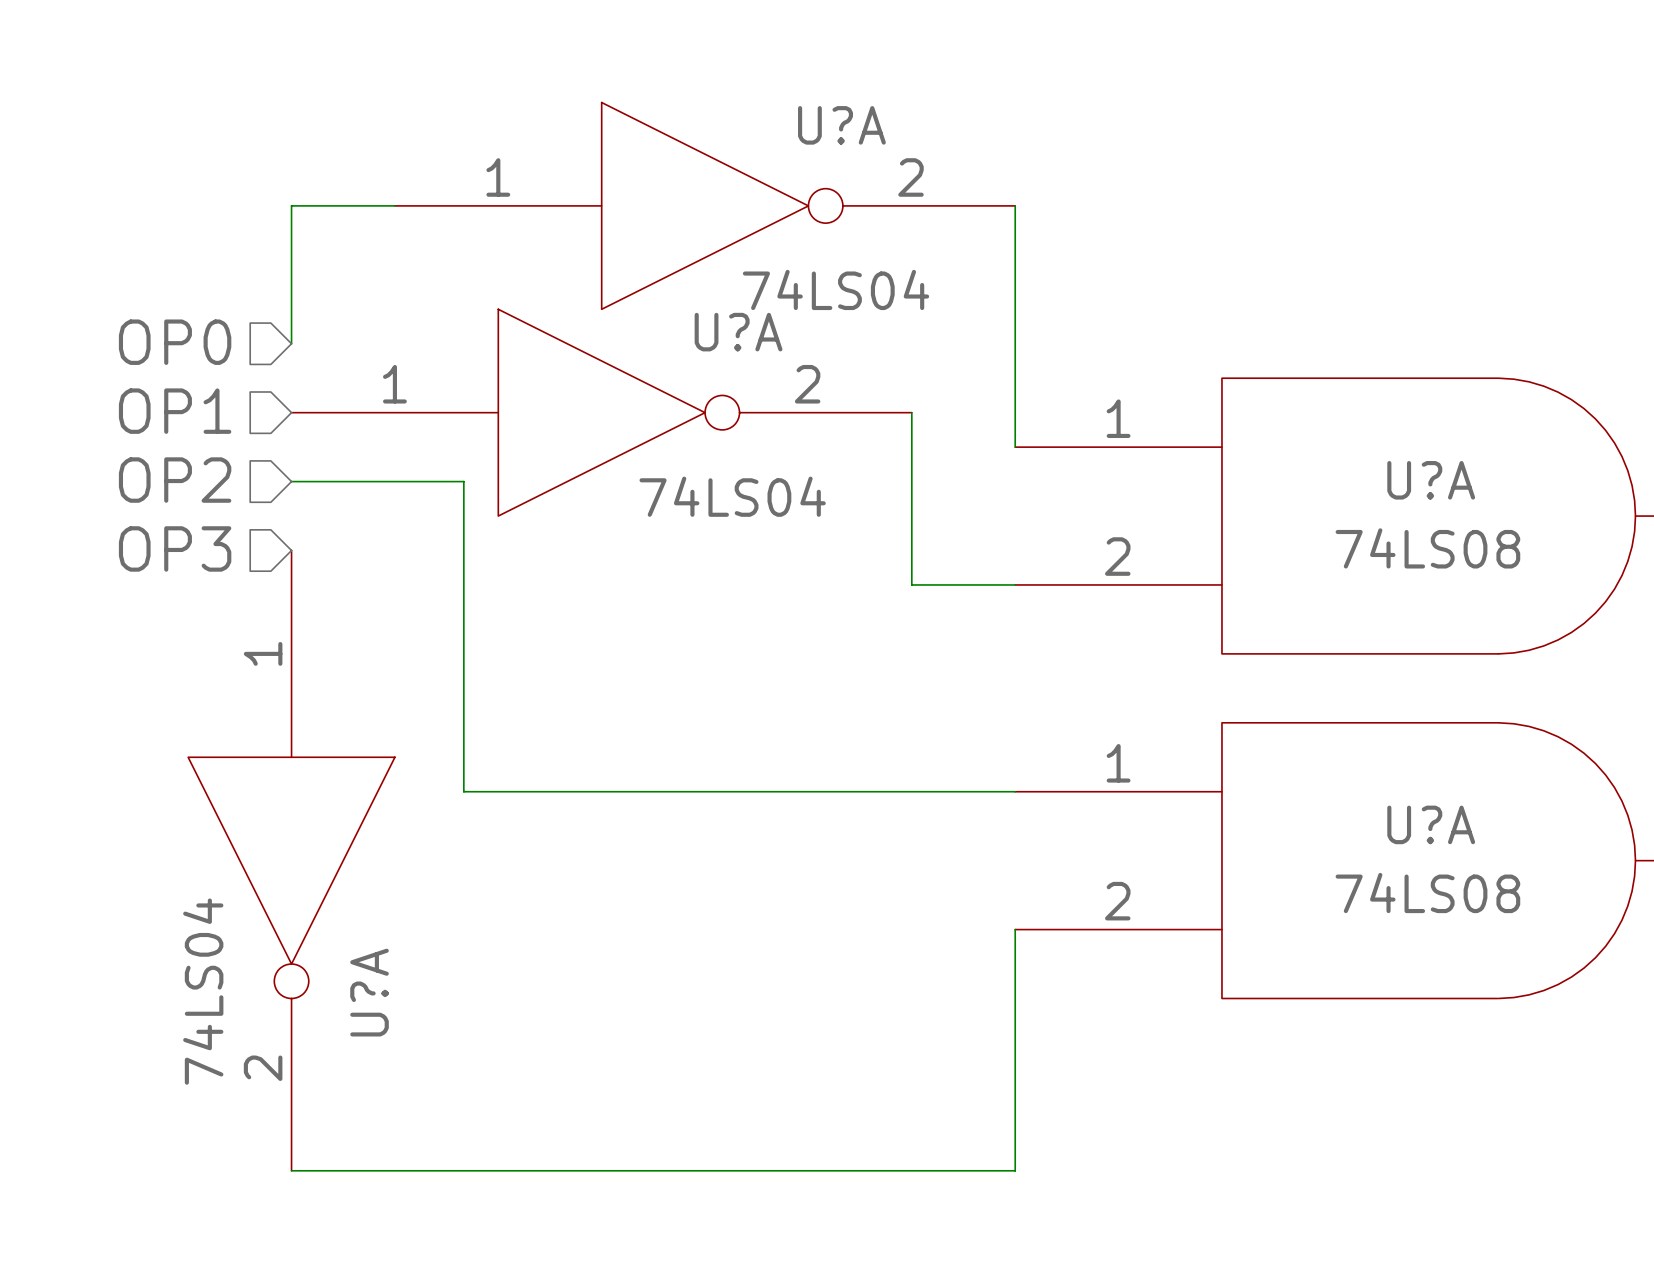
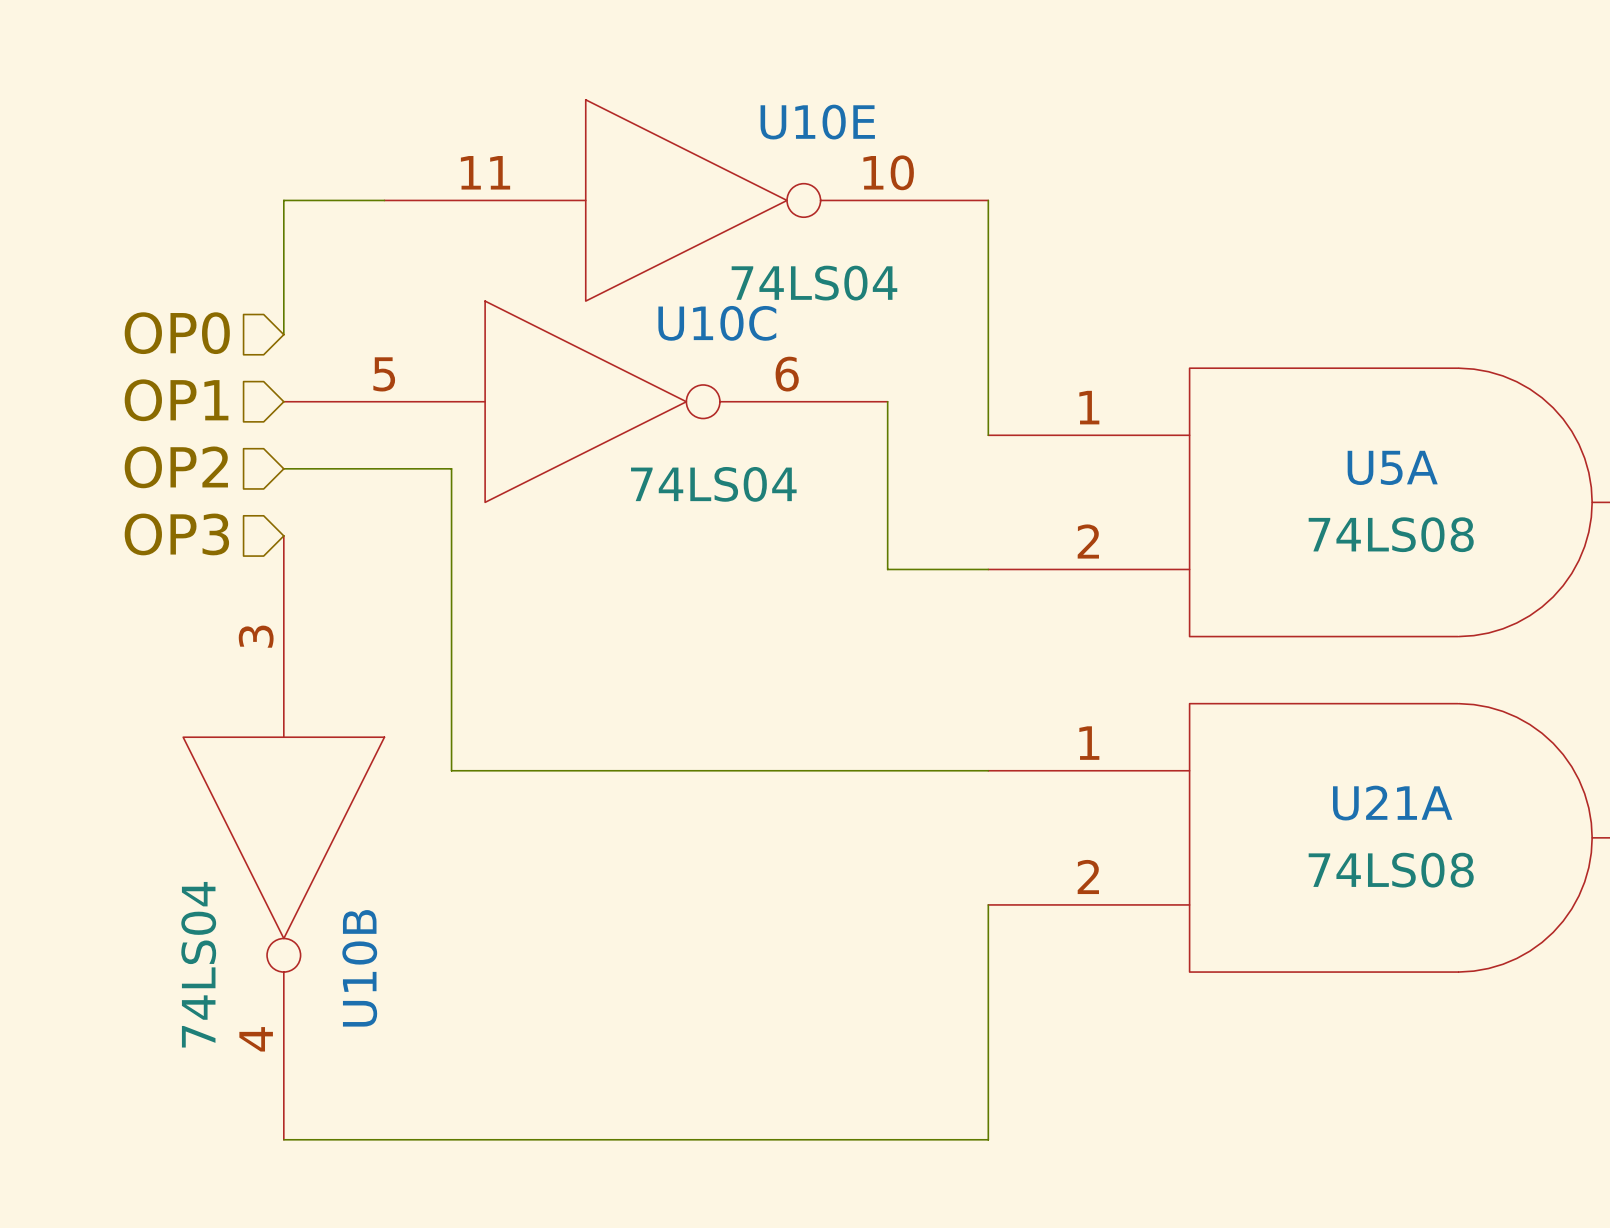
U?A name: U?A (841, 125) -> U10E (817, 122)
U?A pin number: 1 (498, 177) -> 11 (485, 172)
U?A pin number: 2 (911, 177) -> 10 (888, 172)
U?A name: U?A (738, 332) -> U10C (717, 323)
U?A pin number: 1 (394, 384) -> 5 (384, 374)
U?A pin number: 2 (807, 384) -> 6 (787, 374)
U?A name: U?A (1431, 480) -> U5A (1392, 467)
U?A pin number: 1 (263, 653) -> 3 (256, 636)
U?A name: U?A (1431, 824) -> U21A (1392, 803)
U?A name: U?A (369, 992) -> U10B (359, 968)
U?A pin number: 2 (263, 1068) -> 4 (256, 1039)

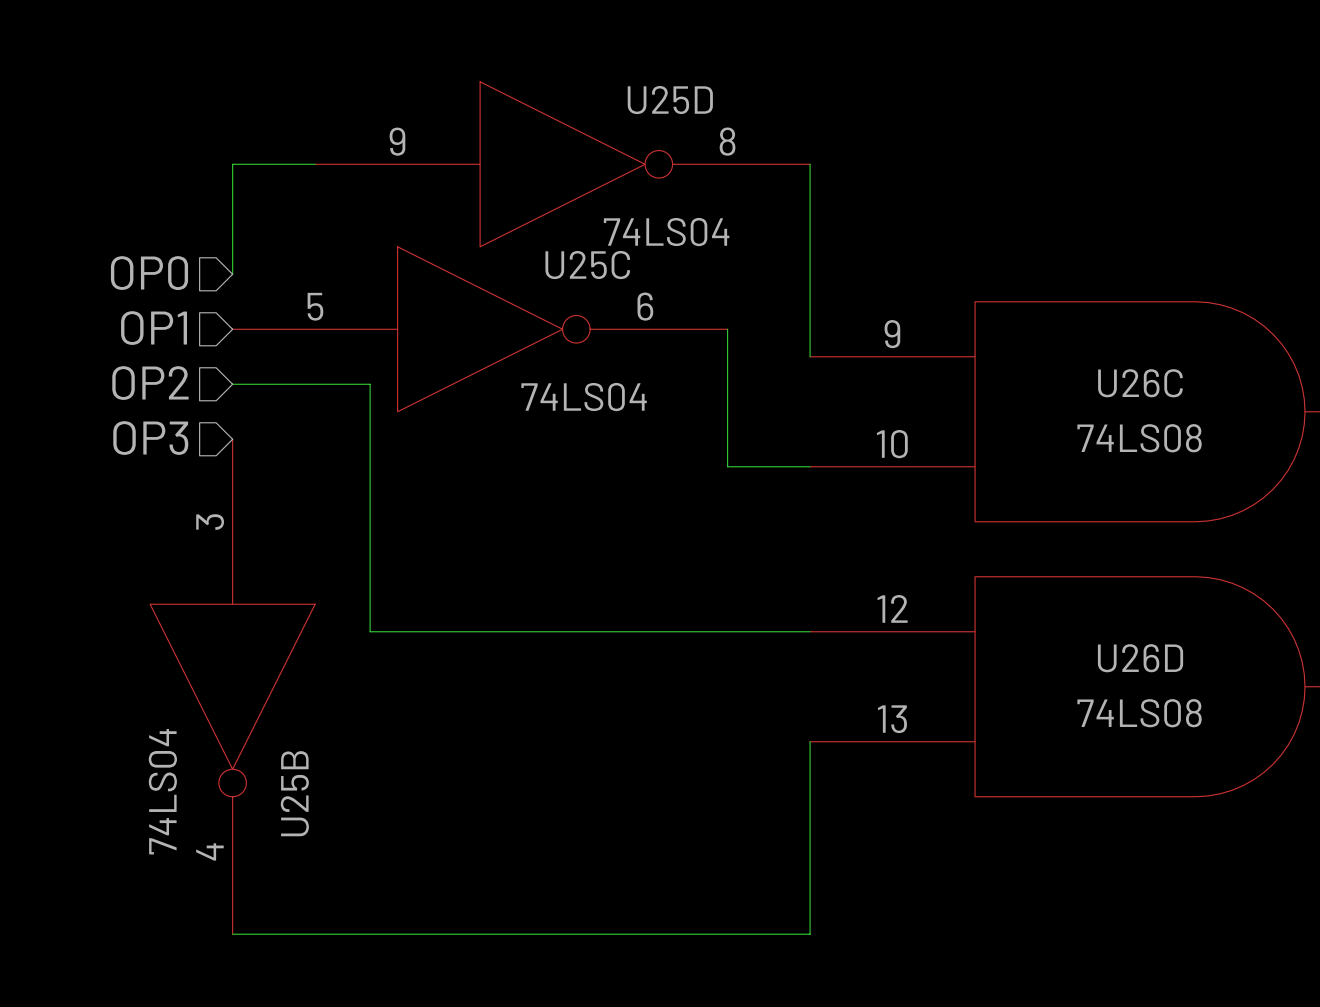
U10E name: U10E (817, 122) -> U25D (670, 100)
U10E pin number: 11 (485, 172) -> 9 (397, 141)
U10E pin number: 10 (888, 172) -> 8 (727, 141)
U10C name: U10C (717, 323) -> U25C (587, 265)
U5A pin number: 1 (1089, 407) -> 9 (892, 334)
U5A name: U5A (1392, 467) -> U26C (1140, 383)
U5A pin number: 2 (1088, 541) -> 10 (892, 444)
U21A pin number: 1 (1089, 743) -> 12 (892, 608)
U21A name: U21A (1392, 803) -> U26D (1140, 658)
U21A pin number: 2 (1088, 876) -> 13 (892, 719)
U10B name: U10B (359, 968) -> U25B (294, 793)

